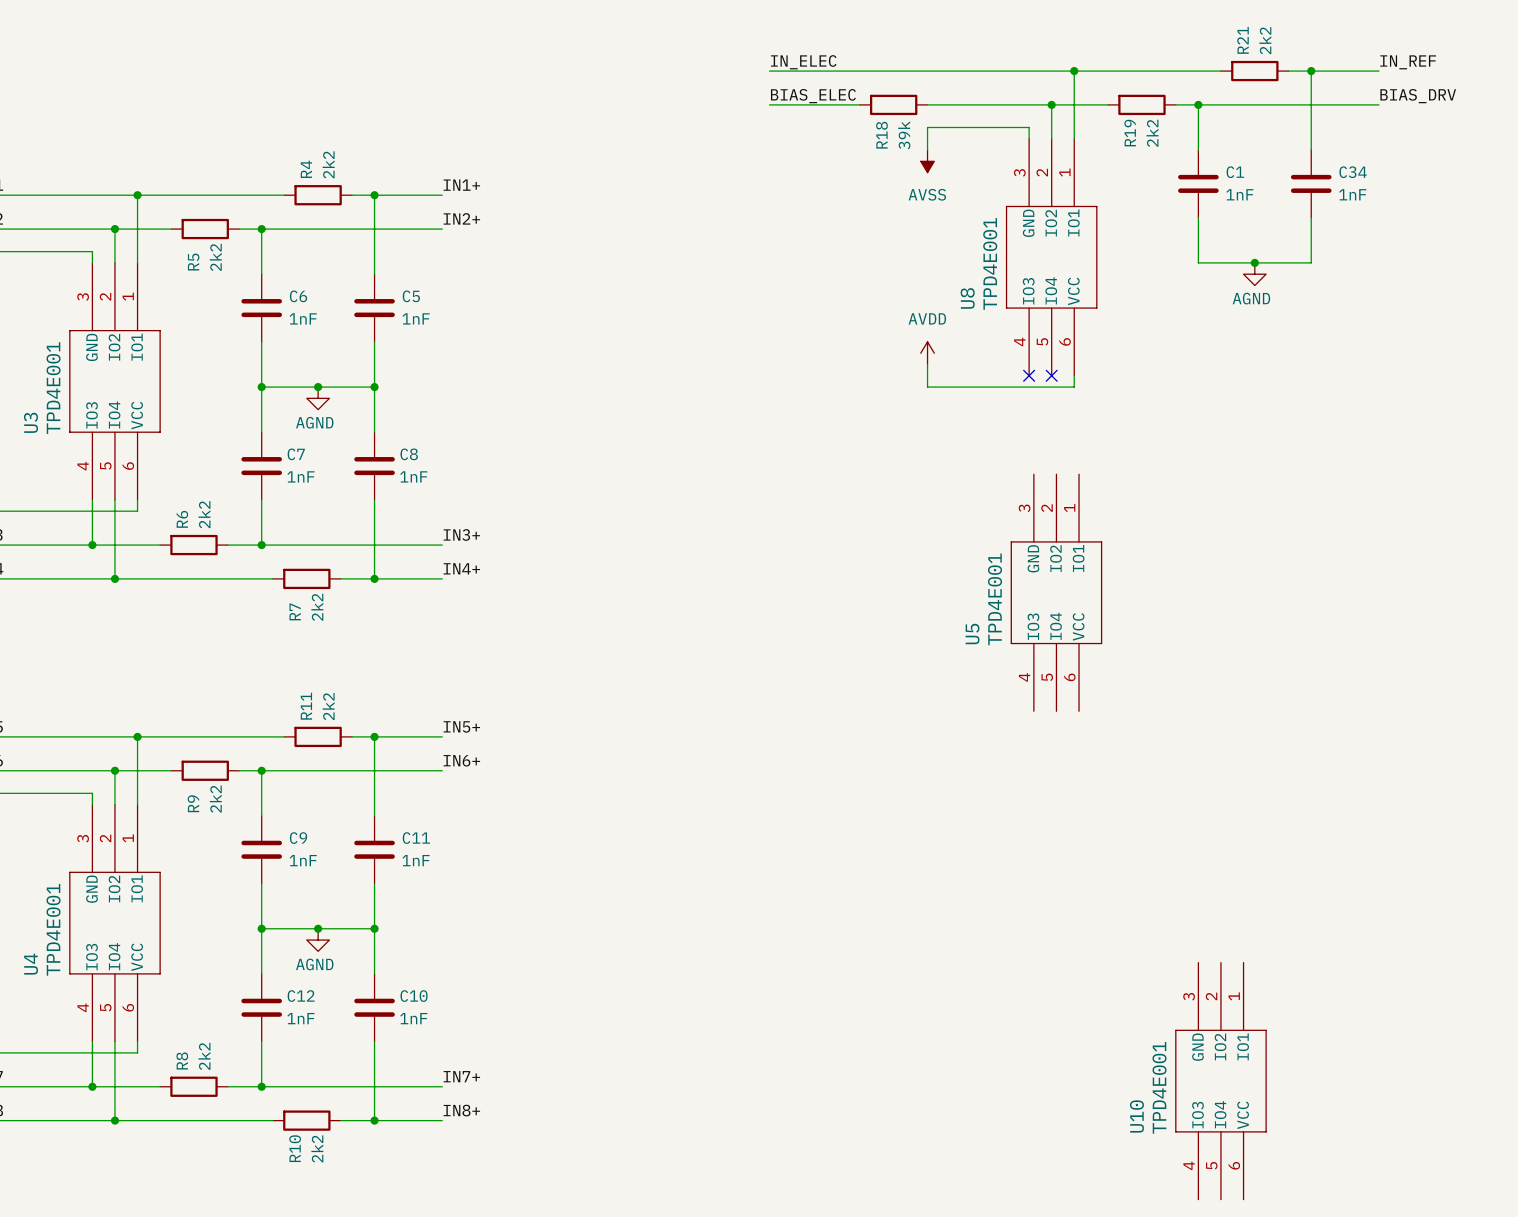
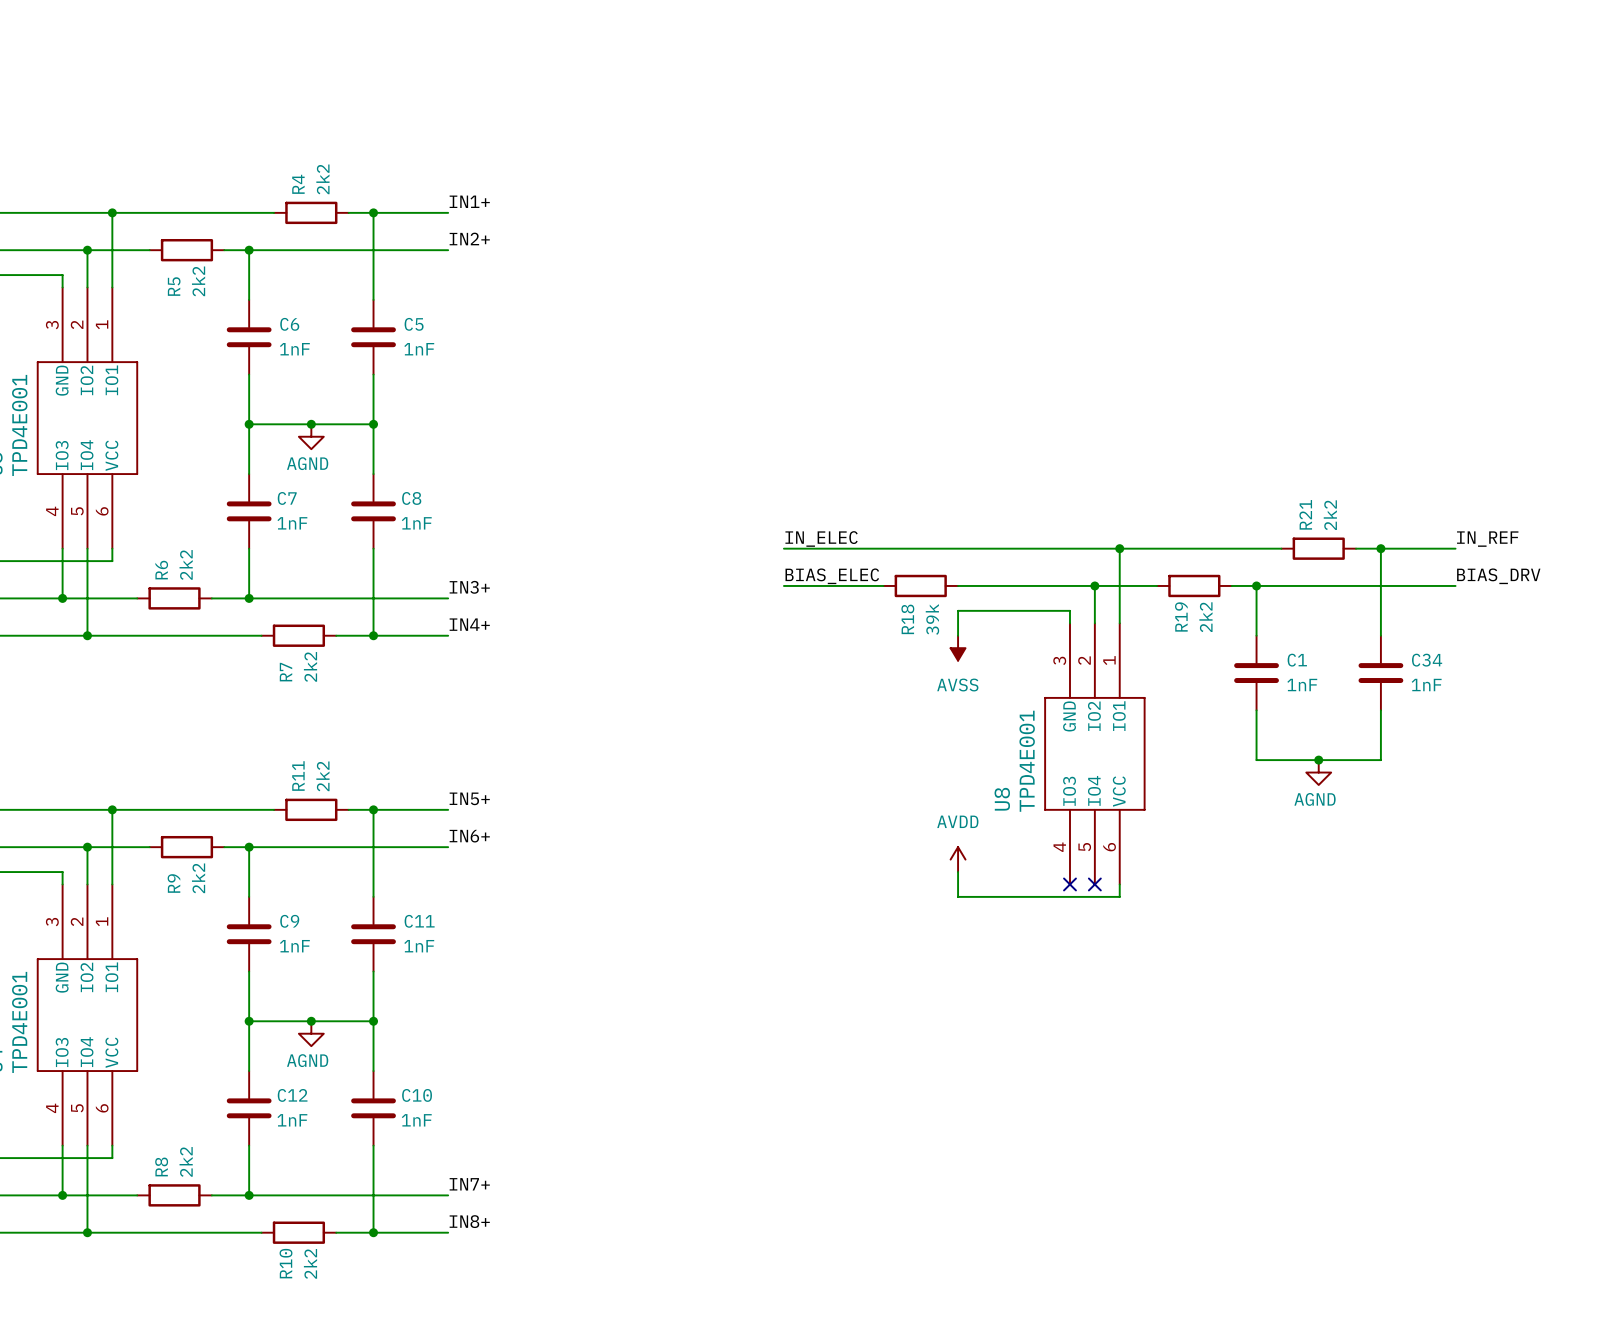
label: IN_ELEC (803, 62) -> none
label: IN_REF (1408, 62) -> none
wire: (769, 71) (1220, 71) -> none
wire: (1074, 71) (1074, 138) -> none
junction: (1074, 71) -> none
R21 position: (1254, 71) -> (1318, 548)
wire: (1288, 71) (1378, 71) -> none
wire: (1311, 71) (1311, 150) -> none
junction: (1311, 71) -> none
label: BIAS_ELEC (813, 96) -> none
label: BIAS_DRV (1418, 96) -> none
wire: (769, 104) (859, 104) -> none
R18 position: (893, 104) -> (920, 585)
wire: (927, 104) (1108, 104) -> none
wire: (1051, 104) (1051, 138) -> none
junction: (1051, 104) -> none
R19 position: (1141, 104) -> (1194, 585)
wire: (1175, 104) (1378, 104) -> none
wire: (1198, 104) (1198, 150) -> none
junction: (1198, 104) -> none
wire: (1029, 138) (1029, 127) (927, 127) (927, 150) -> none
power symbol: AVSS (927, 161) -> none
C1 position: (1198, 183) -> (1256, 673)
C34 position: (1311, 183) -> (1380, 673)
wire: (1198, 217) (1198, 262) (1311, 262) (1311, 217) -> none
U8 position: (1051, 257) -> (1094, 753)
junction: (1254, 262) -> none
power symbol: AGND (1254, 274) -> none
power symbol: AVDD (927, 353) -> none
wire: (927, 364) (927, 387) (1074, 387) (1074, 375) -> none
no-connect mark: (1029, 375) -> none
no-connect mark: (1051, 375) -> none
label: none -> IN_ELEC (821, 538)
label: none -> IN_REF (1487, 539)
wire: none -> (783, 548) (1281, 548)
wire: none -> (1119, 548) (1119, 623)
junction: none -> (1119, 548)
wire: none -> (1356, 548) (1455, 548)
wire: none -> (1380, 548) (1380, 635)
junction: none -> (1380, 548)
label: none -> BIAS_ELEC (832, 576)
label: none -> BIAS_DRV (1498, 576)
wire: none -> (783, 585) (883, 585)
wire: none -> (958, 585) (1157, 585)
wire: none -> (1094, 585) (1094, 623)
junction: none -> (1094, 585)
wire: none -> (1231, 585) (1455, 585)
wire: none -> (1256, 585) (1256, 635)
junction: none -> (1256, 585)
wire: none -> (1069, 623) (1069, 610) (958, 610) (958, 635)
power symbol: none -> AVSS (958, 648)
U5: TPD4E001 (1056, 592) -> none
wire: none -> (1256, 710) (1256, 760) (1380, 760) (1380, 710)
junction: none -> (1318, 760)
power symbol: none -> AGND (1318, 772)
power symbol: none -> AVDD (958, 859)
wire: none -> (958, 872) (958, 896) (1119, 896) (1119, 884)
no-connect mark: none -> (1069, 884)
no-connect mark: none -> (1094, 884)
U10: TPD4E001 (1220, 1081) -> none

